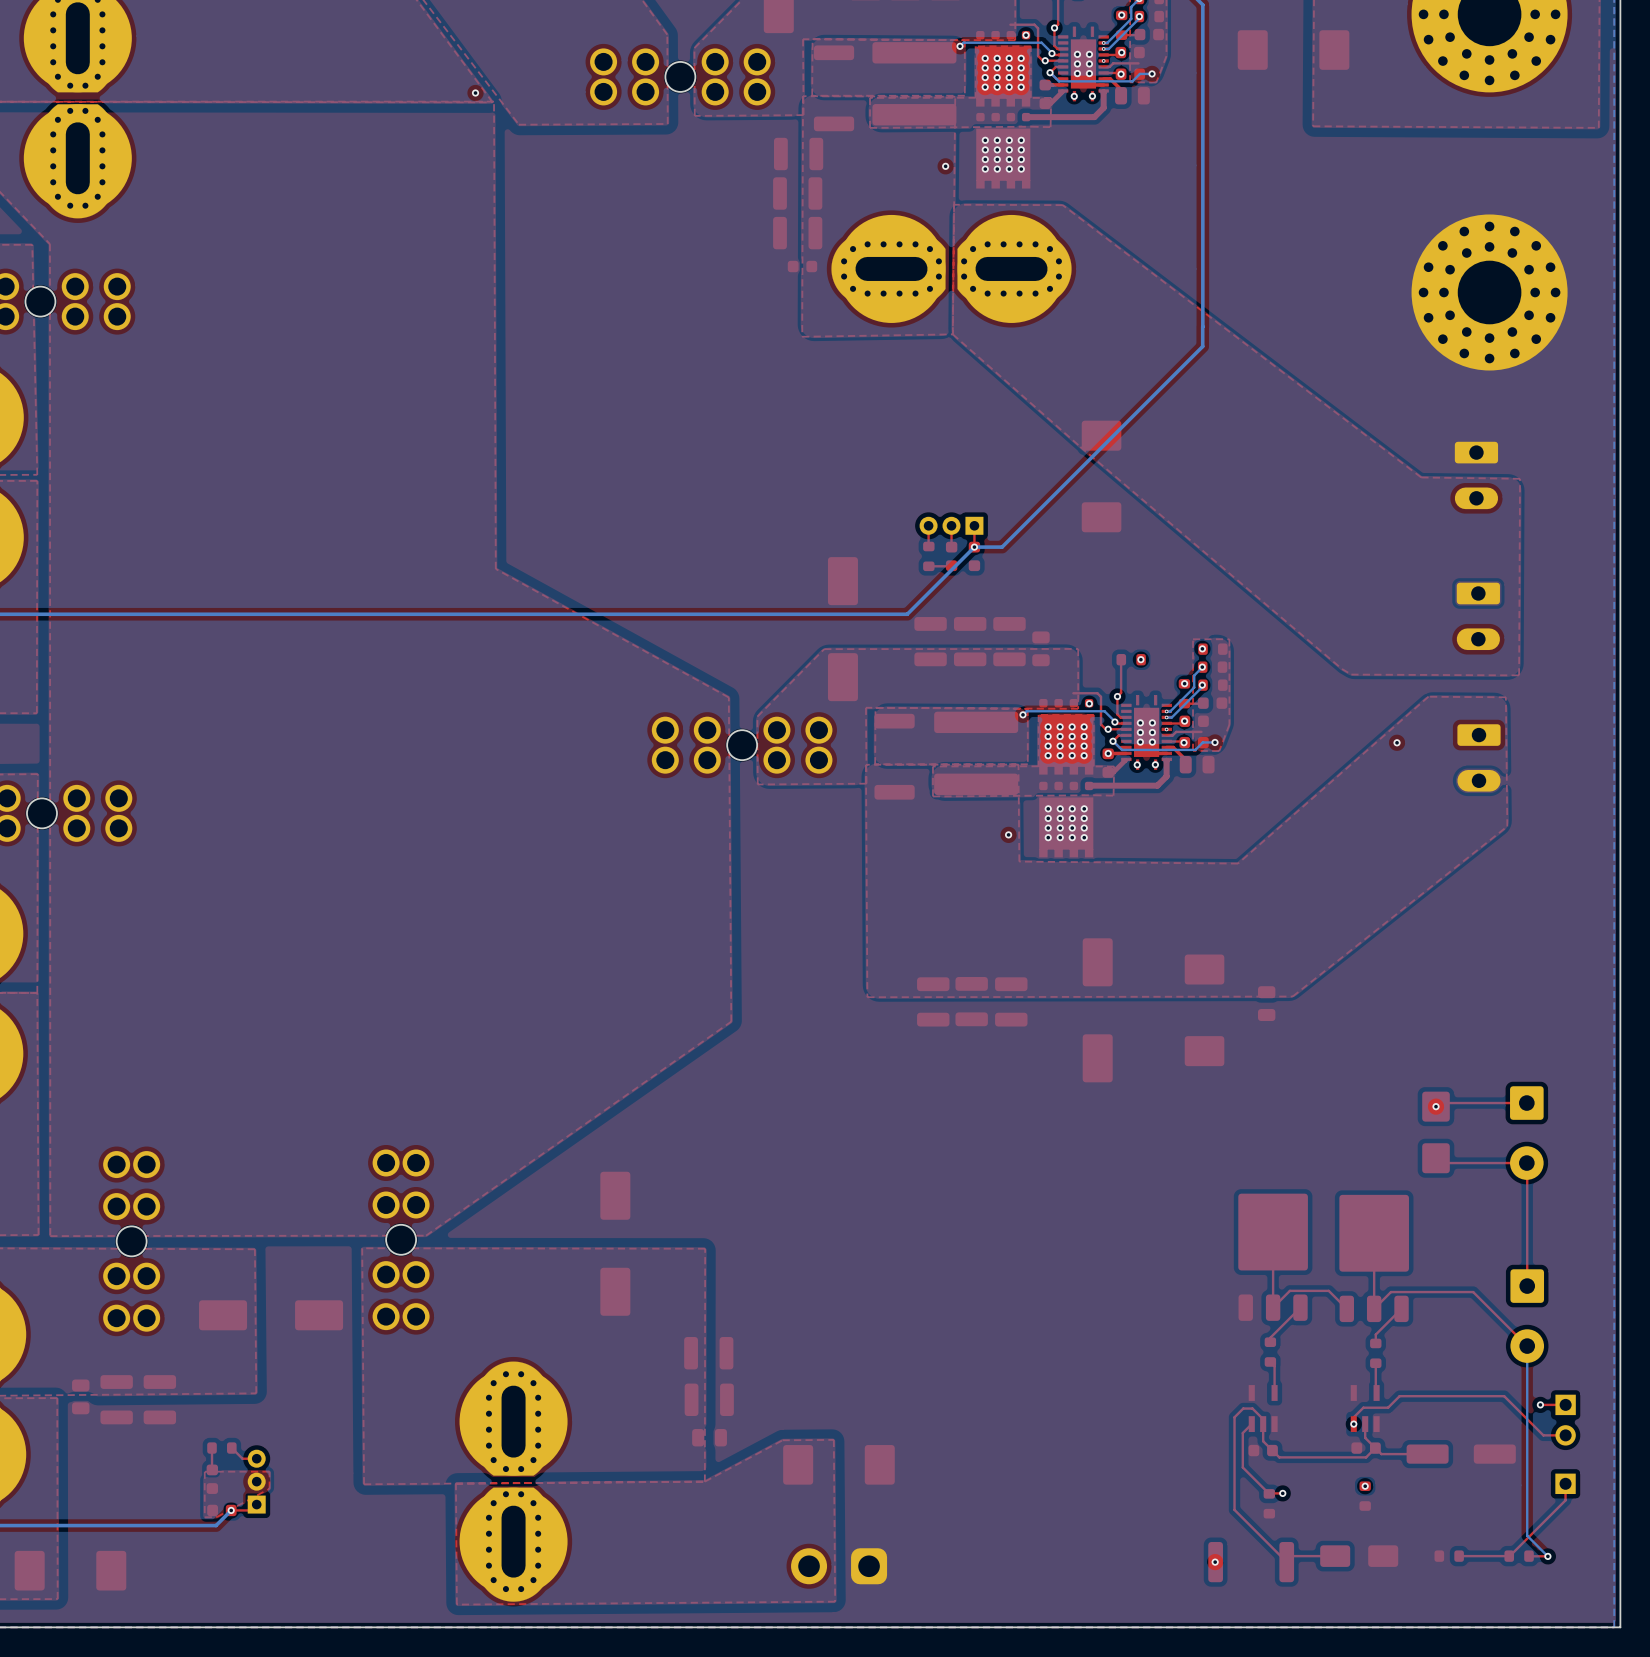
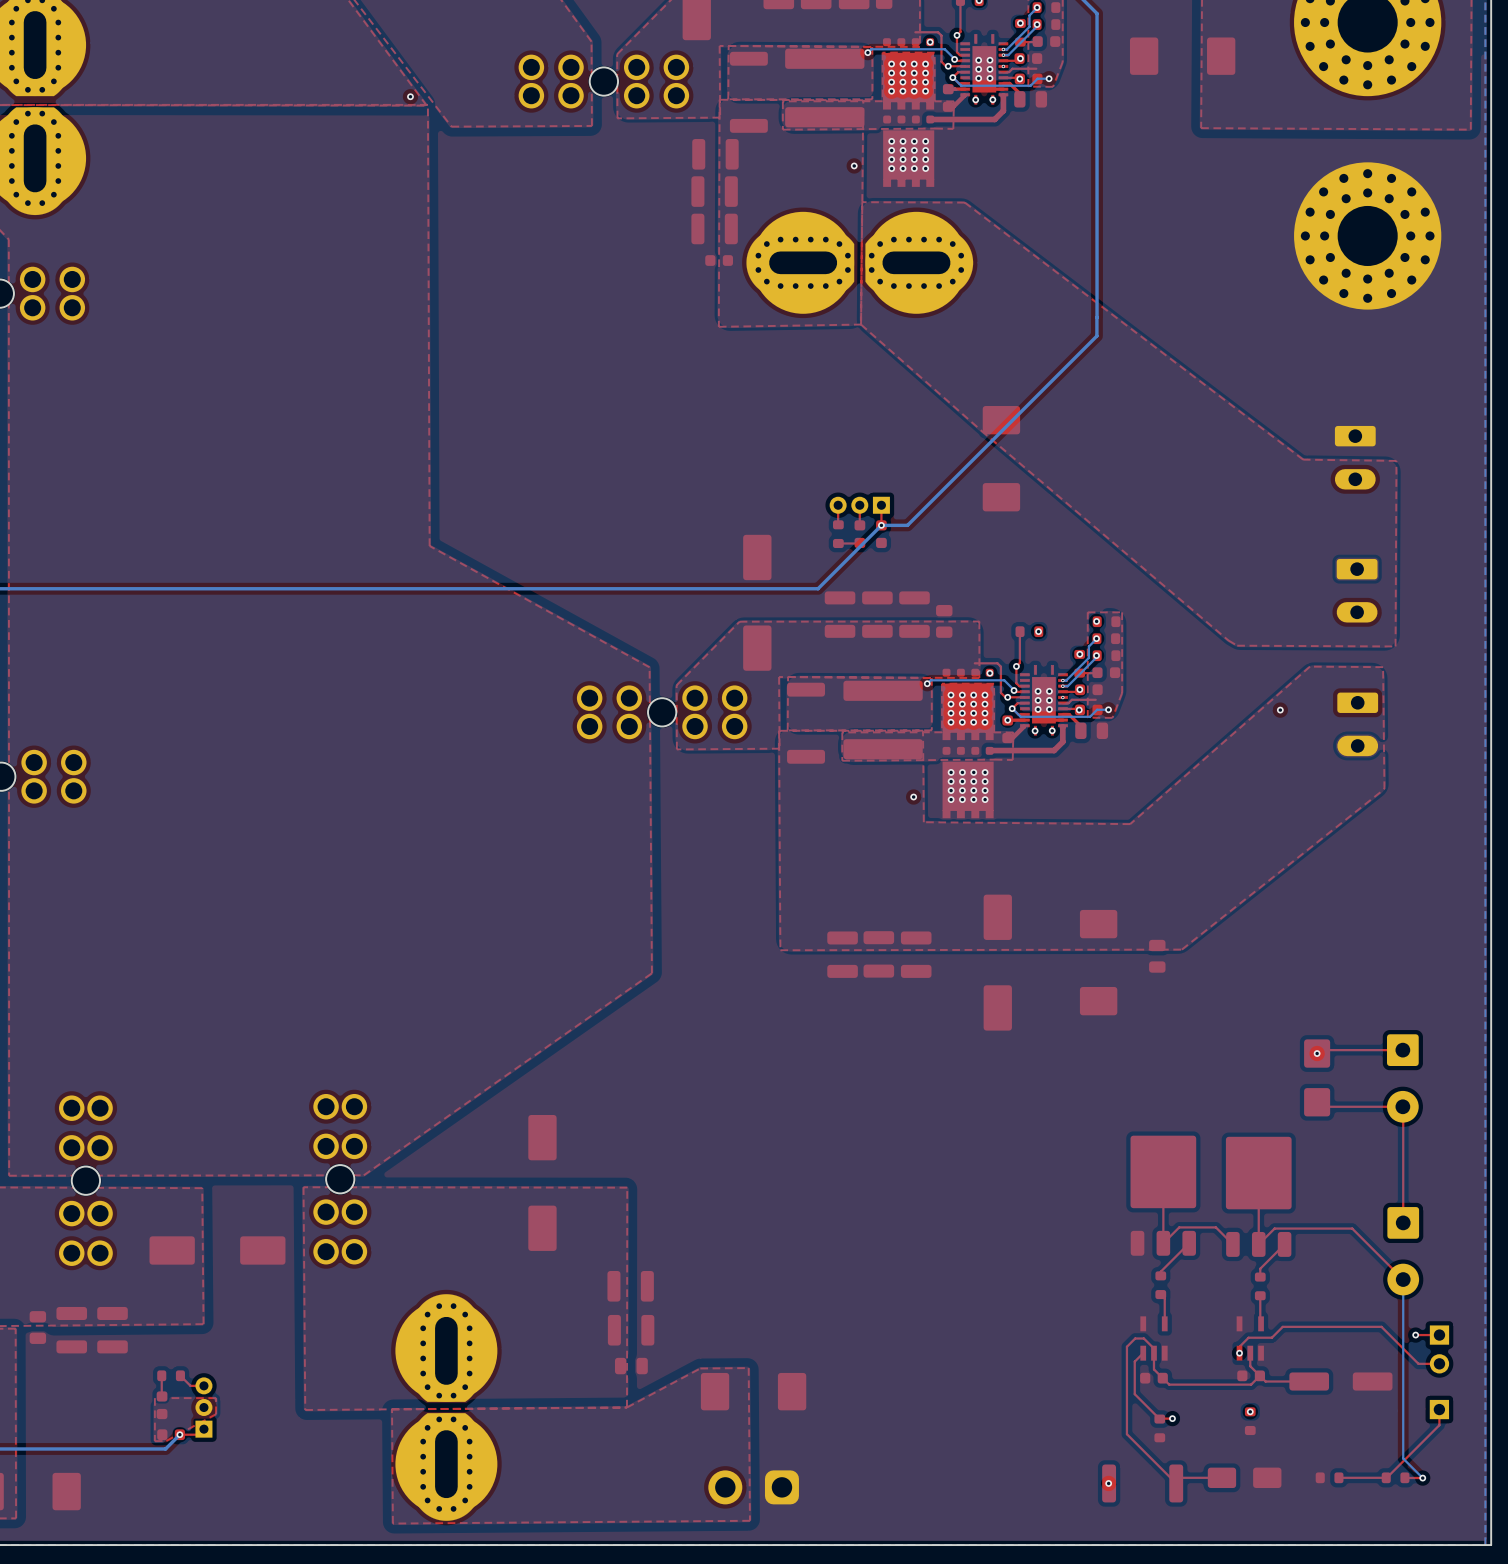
part position: (1489, 292) -> (1367, 235)

